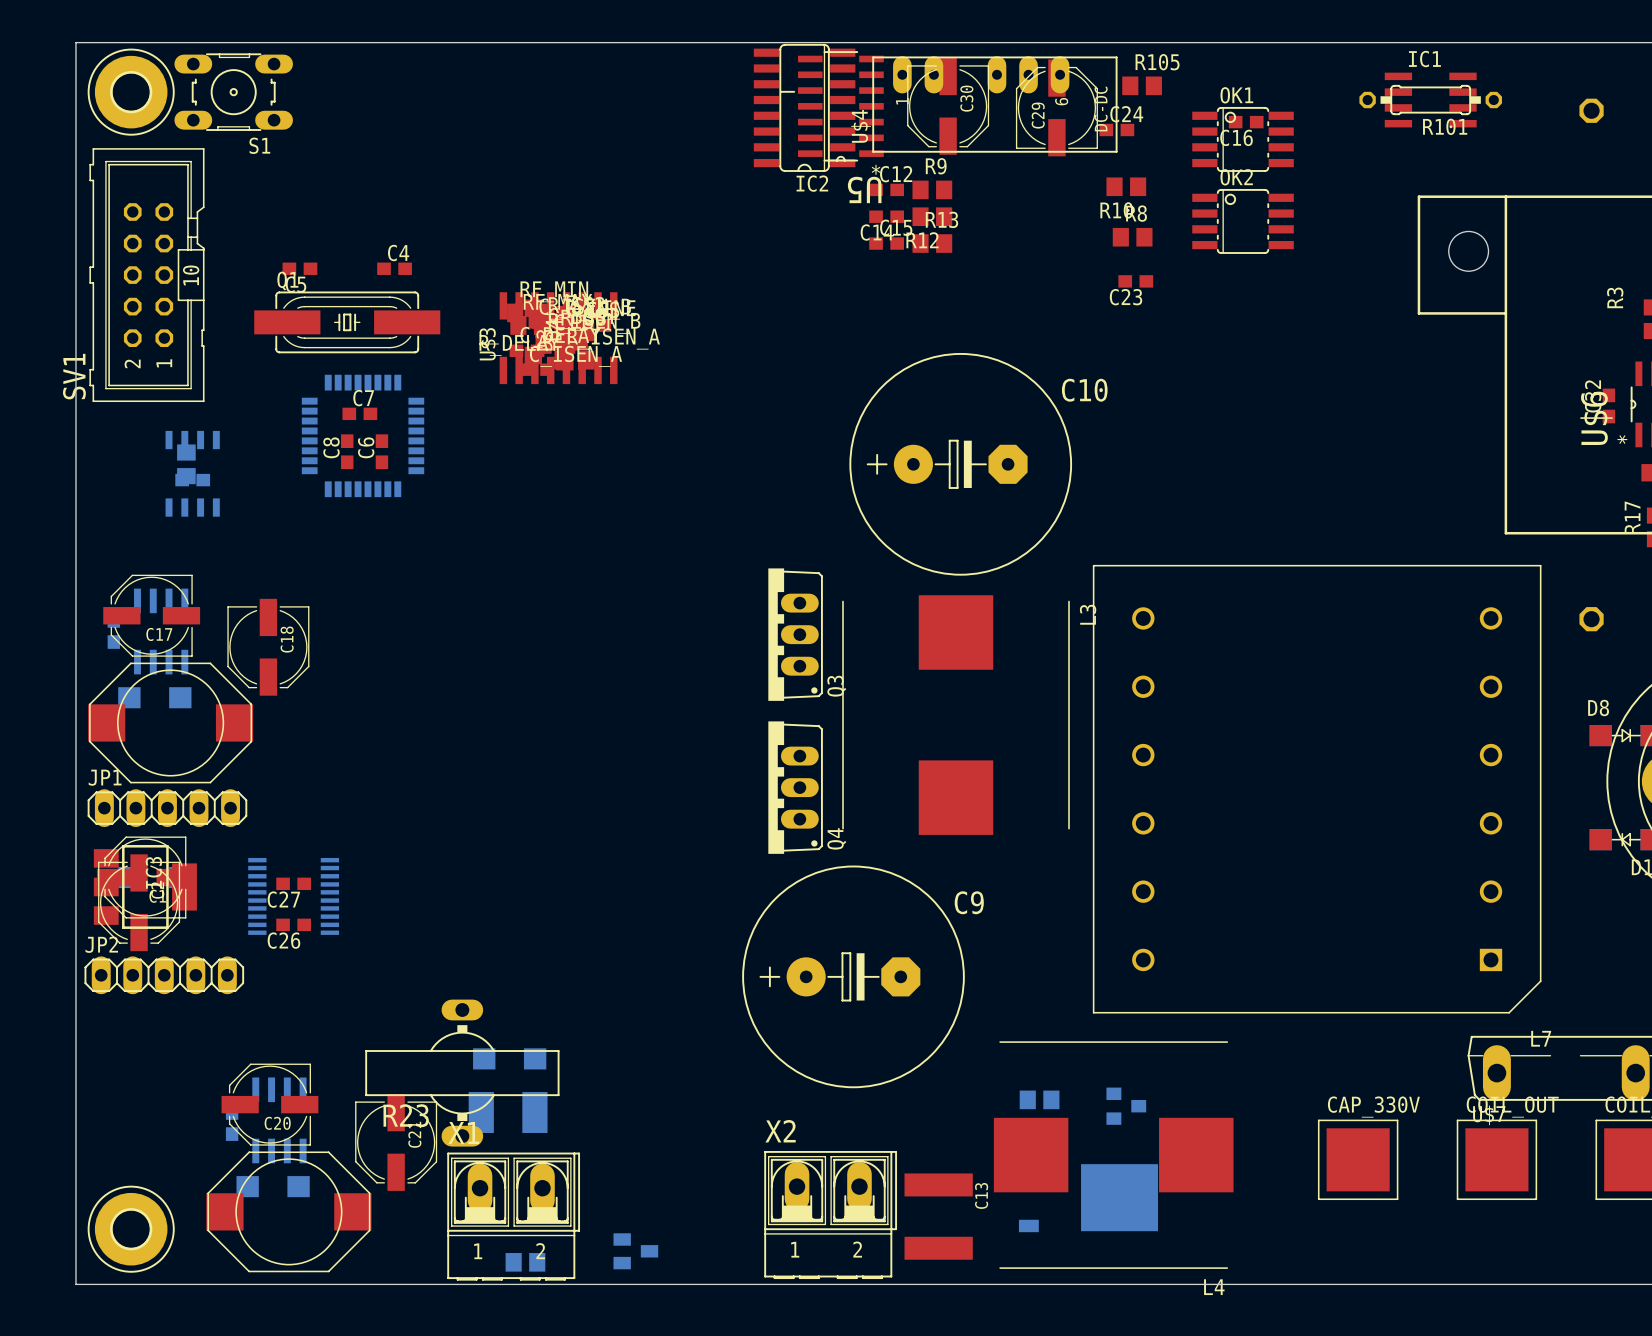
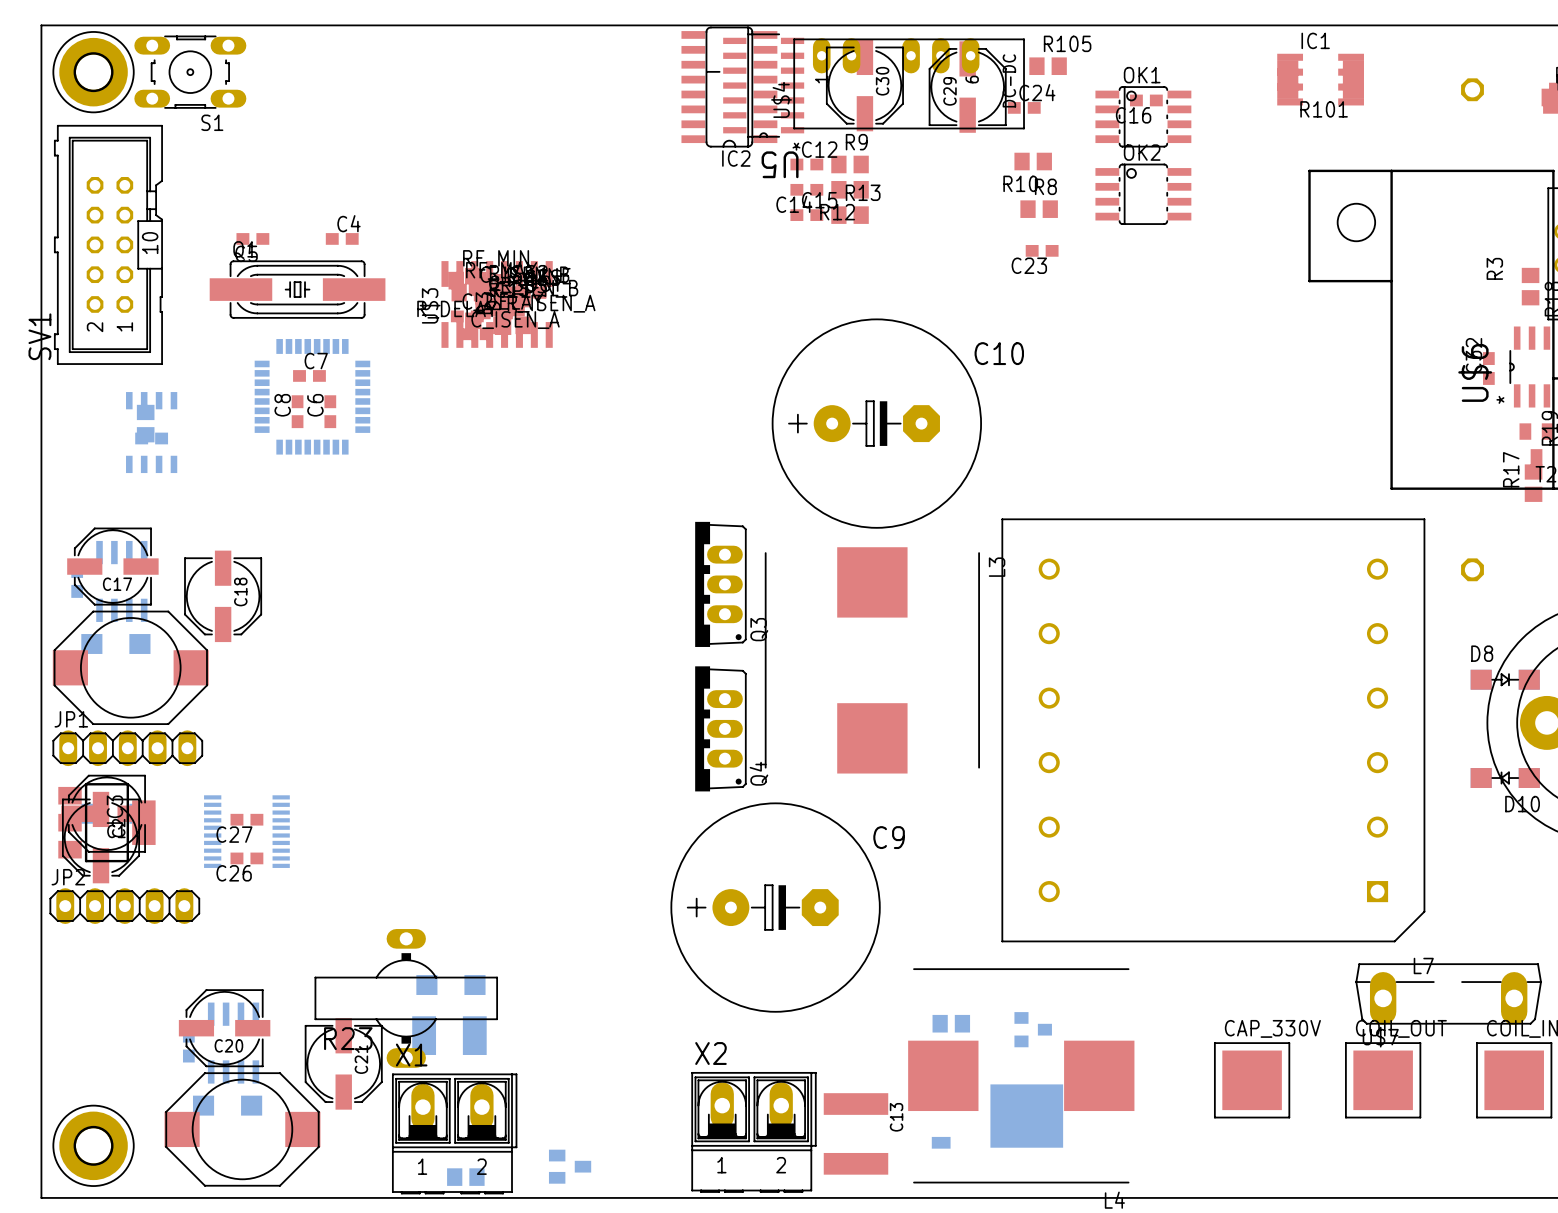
R101 footprint: [1359, 84, 1502, 116] -> [1277, 60, 1364, 99]

